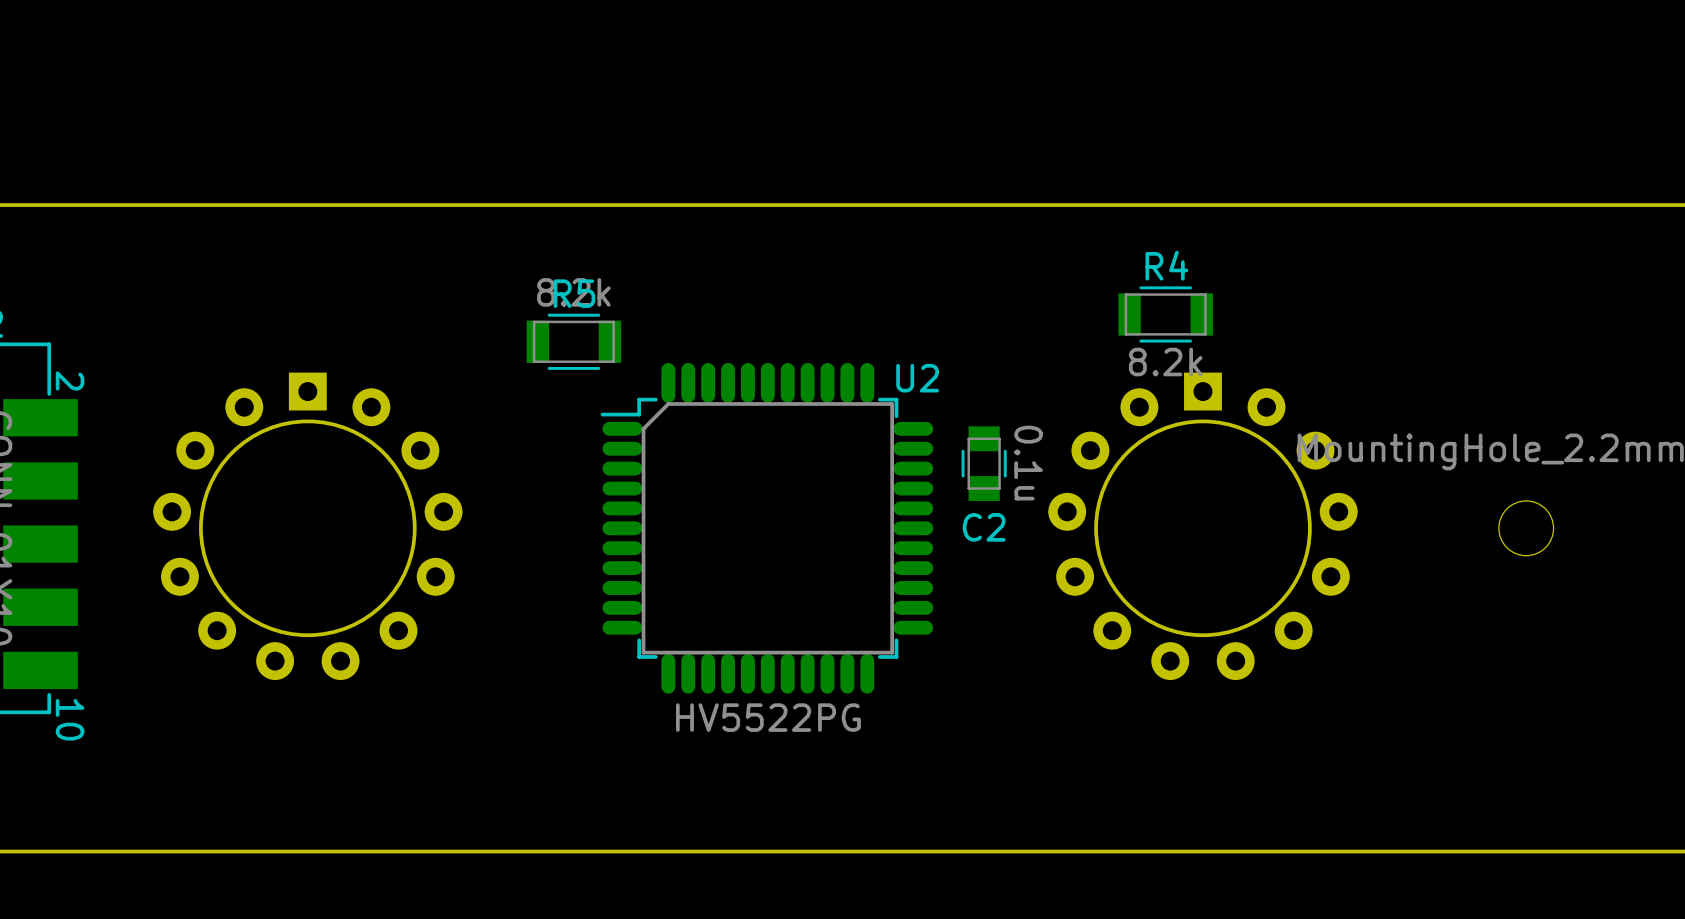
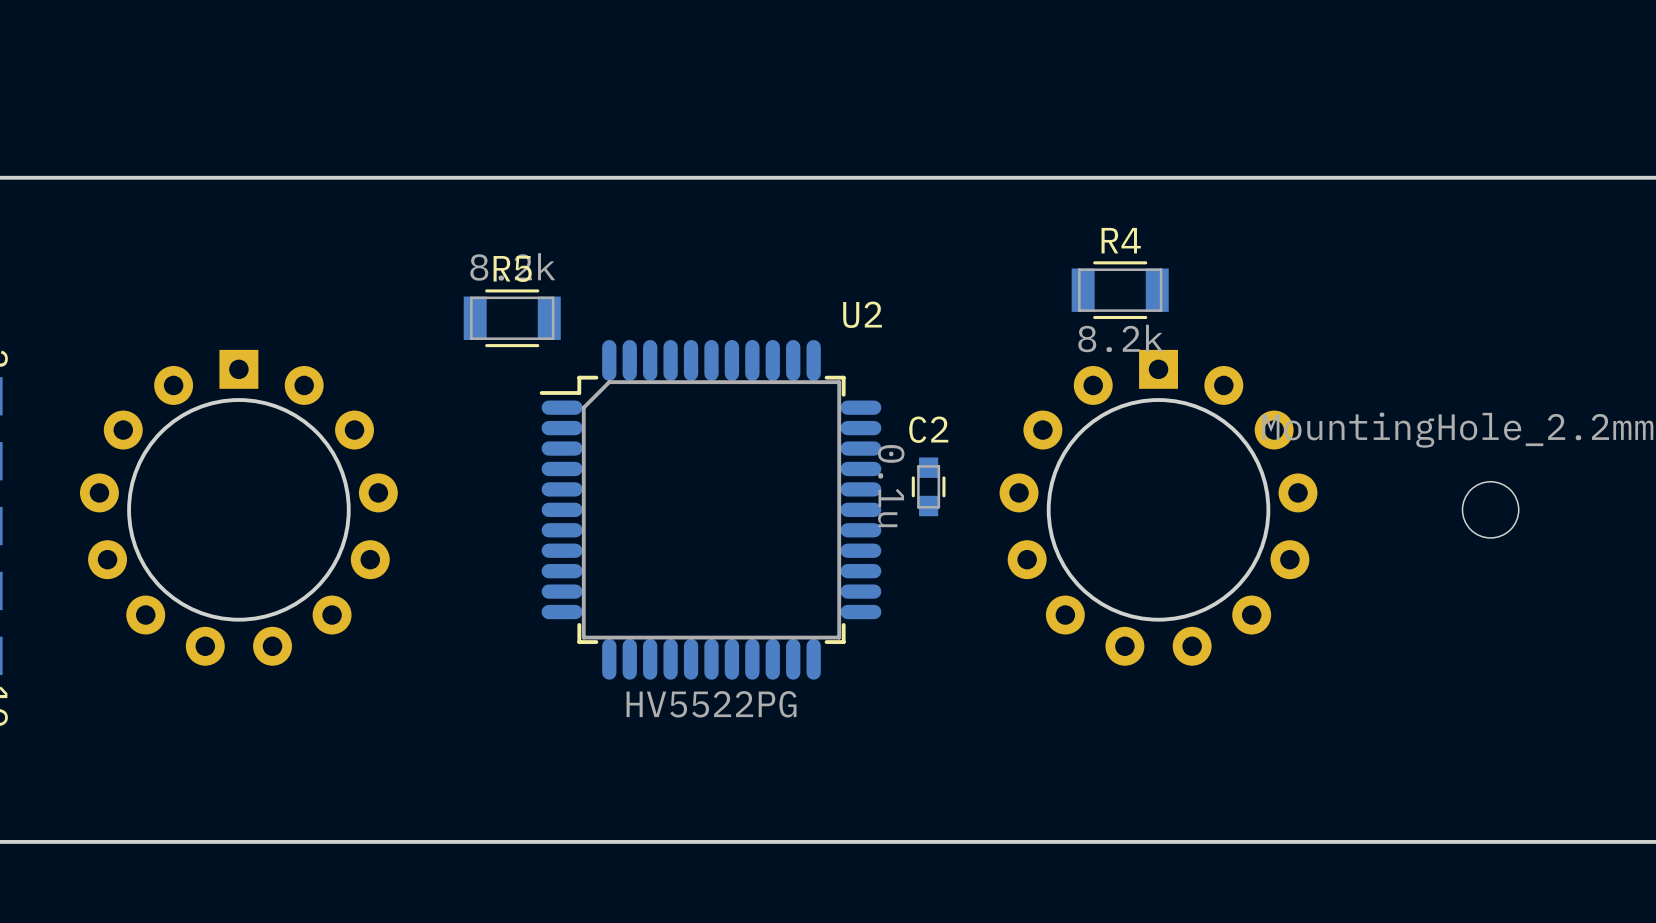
U2 name position: U2 (917, 378) -> U2 (862, 314)
C2 footprint: [961, 426, 1007, 501] -> [911, 457, 946, 517]
C2 value position: 0.1u (1028, 463) -> 0.1u (891, 486)
C2 name position: C2 (984, 527) -> C2 (928, 429)

